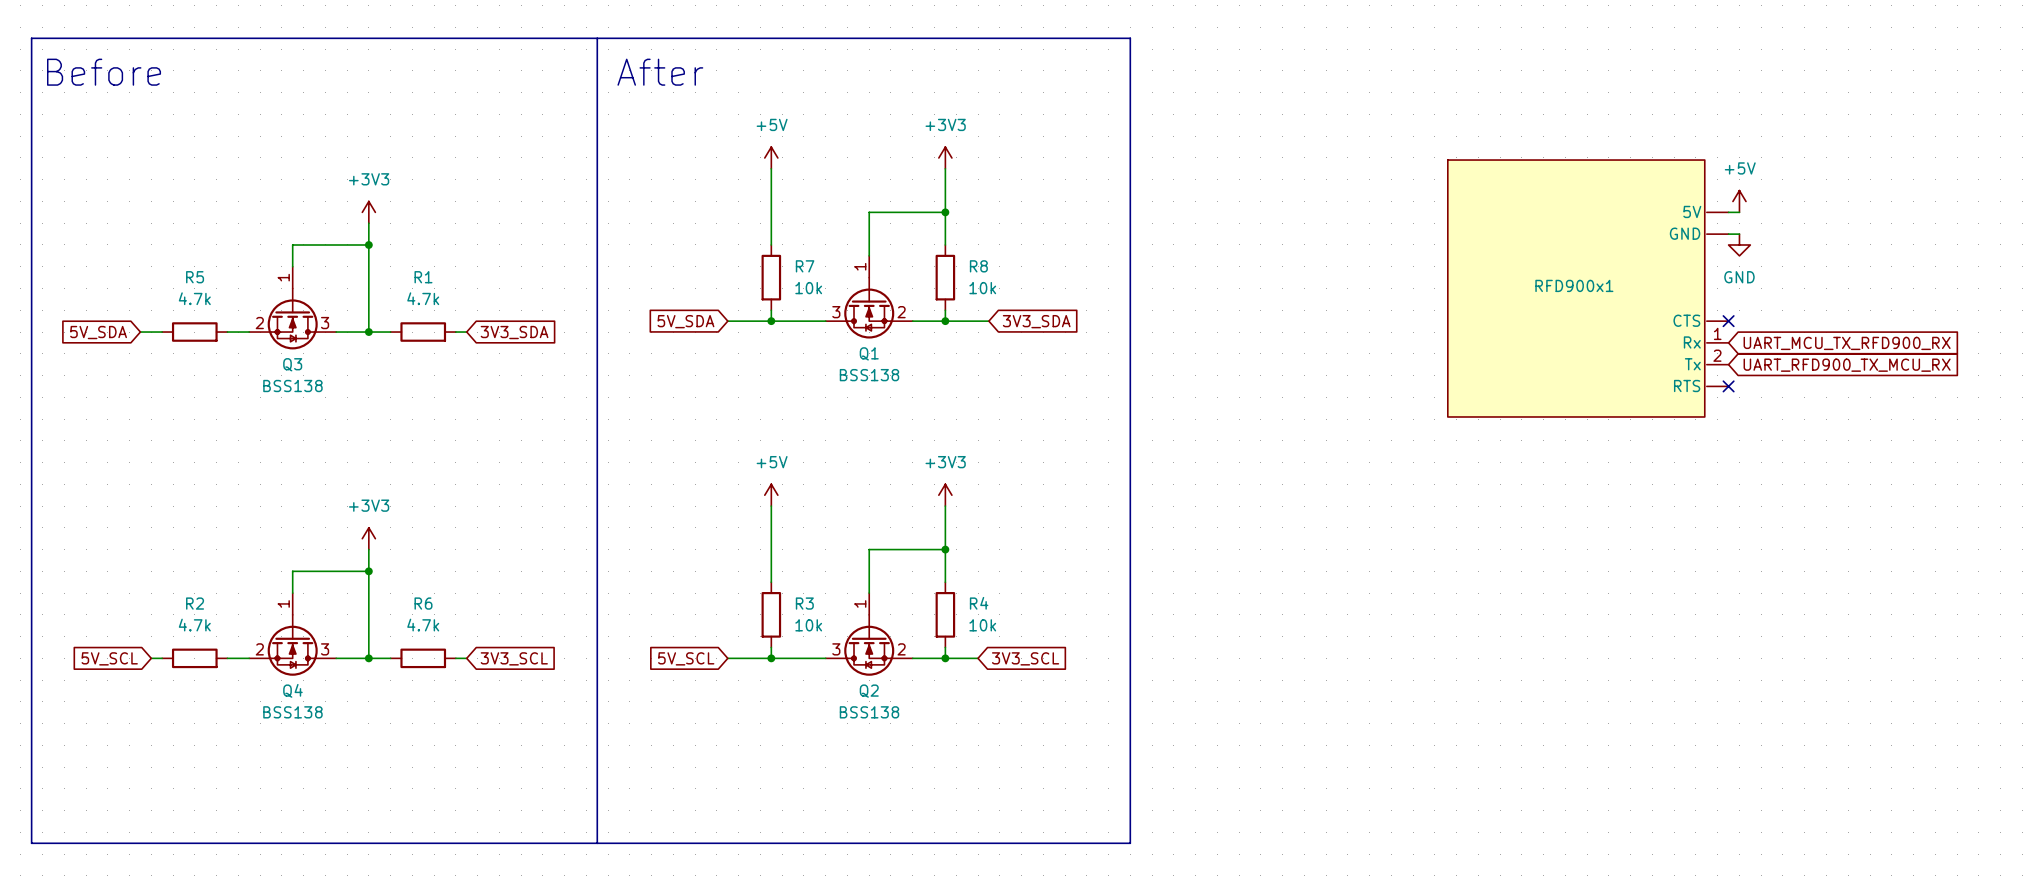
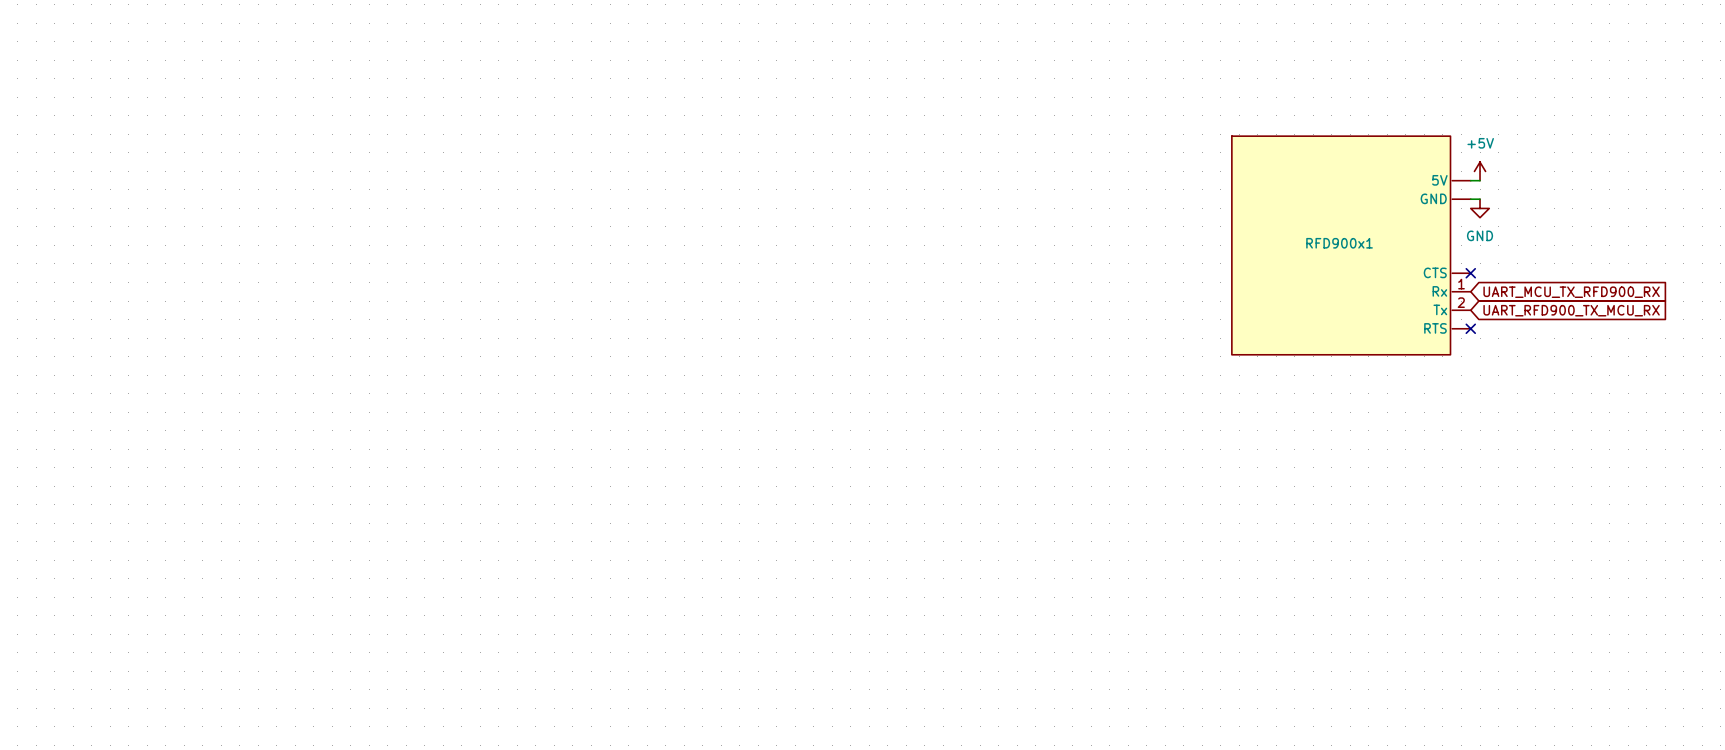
line: (31, 38) (1130, 38) (1130, 843) (31, 843) (31, 38) -> none
line: (597, 38) (597, 843) -> none
text: Before (104, 72) -> none
text: After (660, 72) -> none
power symbol: +5V (771, 157) -> none
power symbol: +3V3 (945, 157) -> none
wire: (771, 168) (771, 244) -> none
wire: (945, 168) (945, 244) -> none
power symbol: +3V3 (368, 212) -> none
wire: (945, 212) (869, 212) (869, 255) -> none
junction: (945, 212) -> none
wire: (368, 223) (368, 332) -> none
wire: (368, 244) (292, 244) (292, 266) -> none
junction: (368, 244) -> none
R7: 10k (771, 277) -> none
R8: 10k (945, 277) -> none
Q1: BSS138 (869, 297) -> none
Q3: BSS138 (292, 308) -> none
wire: (771, 310) (771, 321) -> none
wire: (945, 310) (945, 321) -> none
global label: 5V_SDA (685, 321) -> none
wire: (727, 321) (825, 321) -> none
junction: (771, 321) -> none
wire: (912, 321) (988, 321) -> none
junction: (945, 321) -> none
global label: 3V3_SDA (1036, 321) -> none
global label: 5V_SDA (98, 332) -> none
wire: (140, 332) (162, 332) -> none
R5: 4.7k (194, 332) -> none
wire: (227, 332) (249, 332) -> none
wire: (336, 332) (390, 332) -> none
junction: (368, 332) -> none
R1: 4.7k (423, 332) -> none
wire: (455, 332) (466, 332) -> none
global label: 3V3_SDA (514, 332) -> none
power symbol: +5V (771, 495) -> none
power symbol: +3V3 (945, 495) -> none
wire: (771, 506) (771, 582) -> none
wire: (945, 506) (945, 582) -> none
power symbol: +3V3 (368, 538) -> none
wire: (368, 549) (368, 658) -> none
wire: (945, 549) (869, 549) (869, 593) -> none
junction: (945, 549) -> none
wire: (368, 571) (292, 571) (292, 593) -> none
junction: (368, 571) -> none
R3: 10k (771, 614) -> none
R4: 10k (945, 614) -> none
Q4: BSS138 (292, 634) -> none
Q2: BSS138 (869, 634) -> none
wire: (771, 647) (771, 658) -> none
wire: (945, 647) (945, 658) -> none
global label: 5V_SCL (109, 658) -> none
wire: (151, 658) (162, 658) -> none
R2: 4.7k (194, 658) -> none
wire: (227, 658) (249, 658) -> none
wire: (336, 658) (390, 658) -> none
junction: (368, 658) -> none
R6: 4.7k (423, 658) -> none
wire: (455, 658) (466, 658) -> none
global label: 3V3_SCL (514, 658) -> none
global label: 5V_SCL (686, 658) -> none
wire: (727, 658) (825, 658) -> none
junction: (771, 658) -> none
wire: (912, 658) (978, 658) -> none
junction: (945, 658) -> none
global label: 3V3_SCL (1025, 658) -> none

